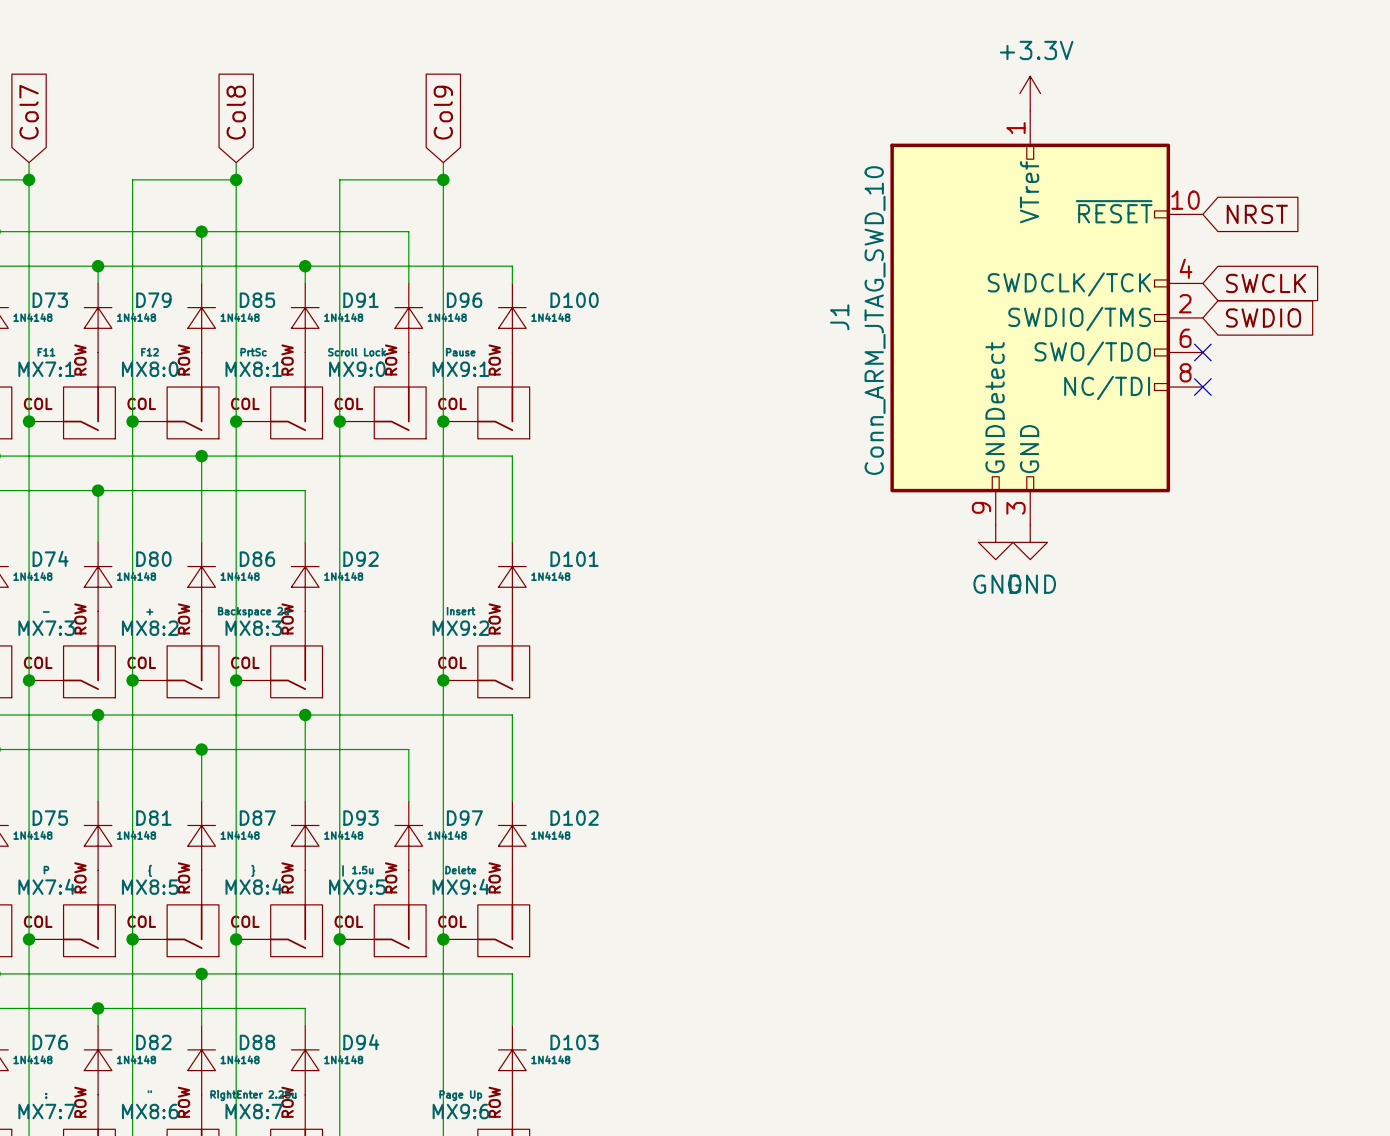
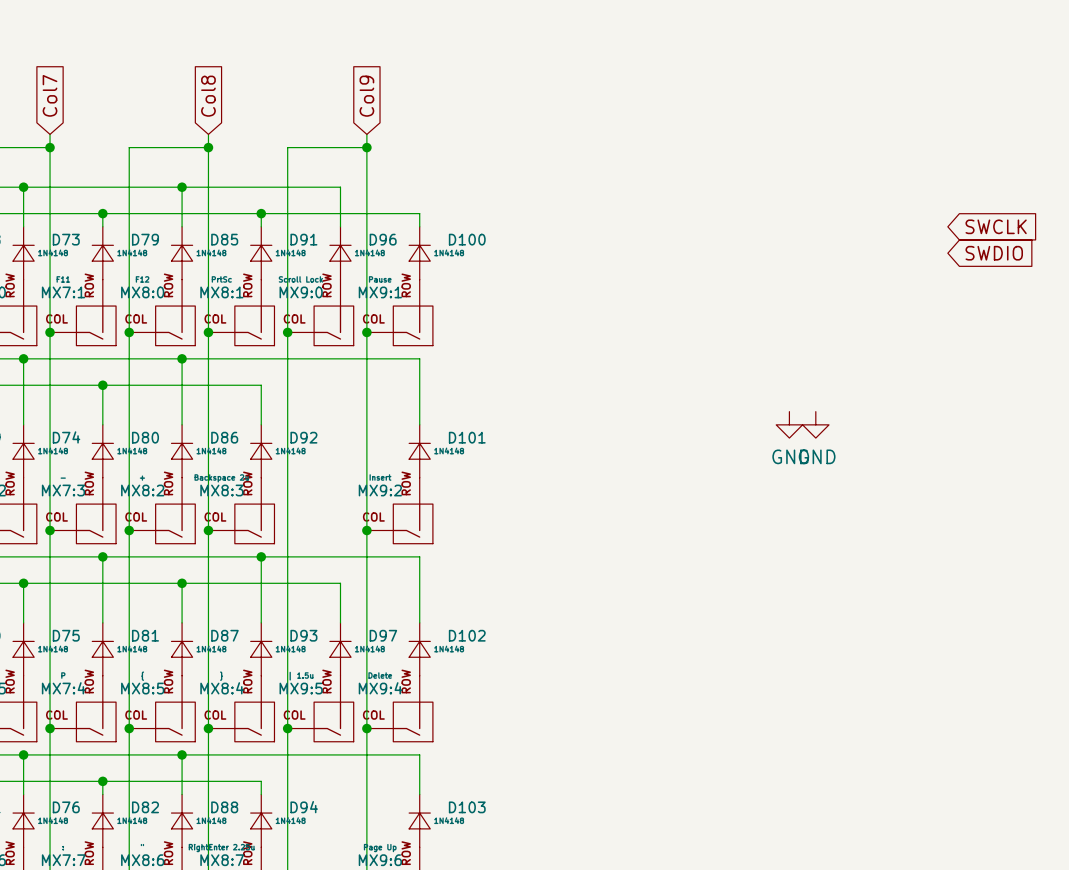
power symbol: +3.3V (1030, 93) -> none
global label: NRST (1257, 214) -> none
J1: Conn_ARM_JTAG_SWD_10 (1046, 317) -> none
no-connect mark: (1202, 352) -> none
no-connect mark: (1202, 387) -> none

